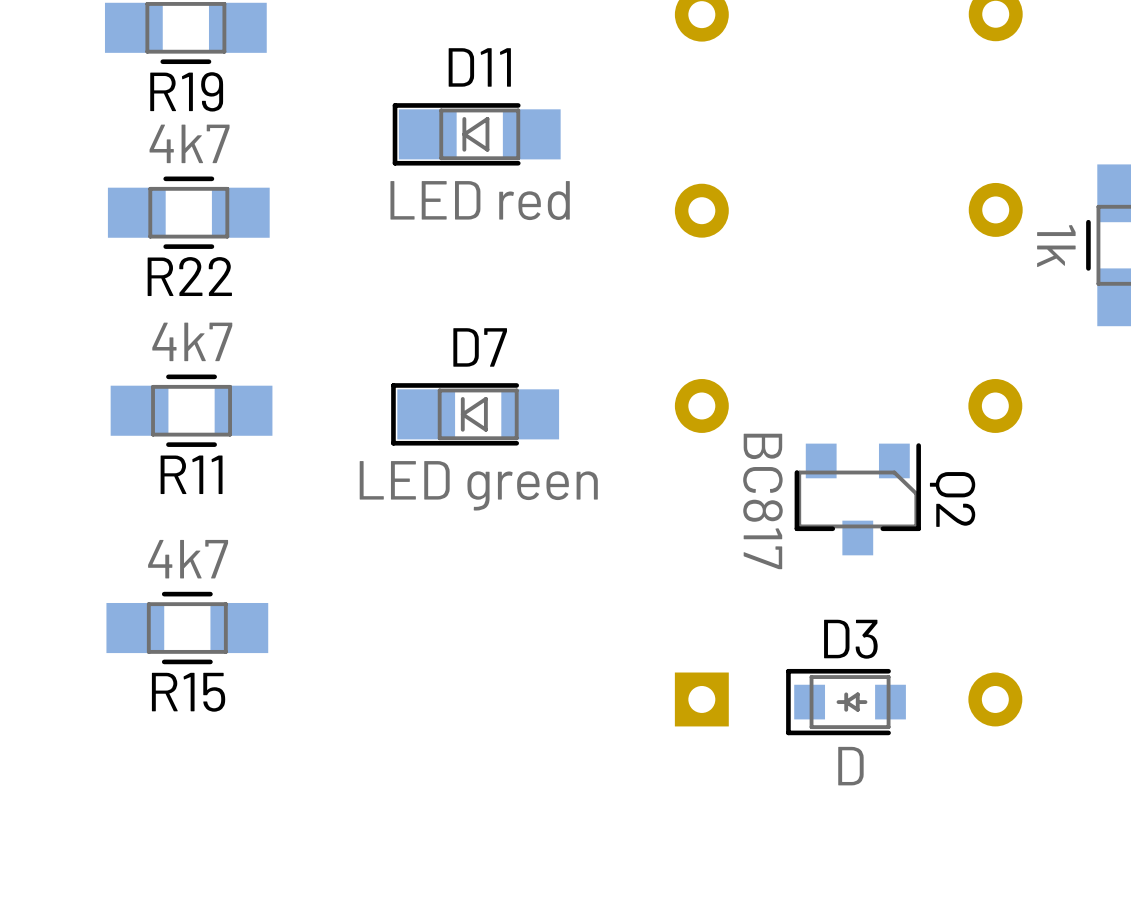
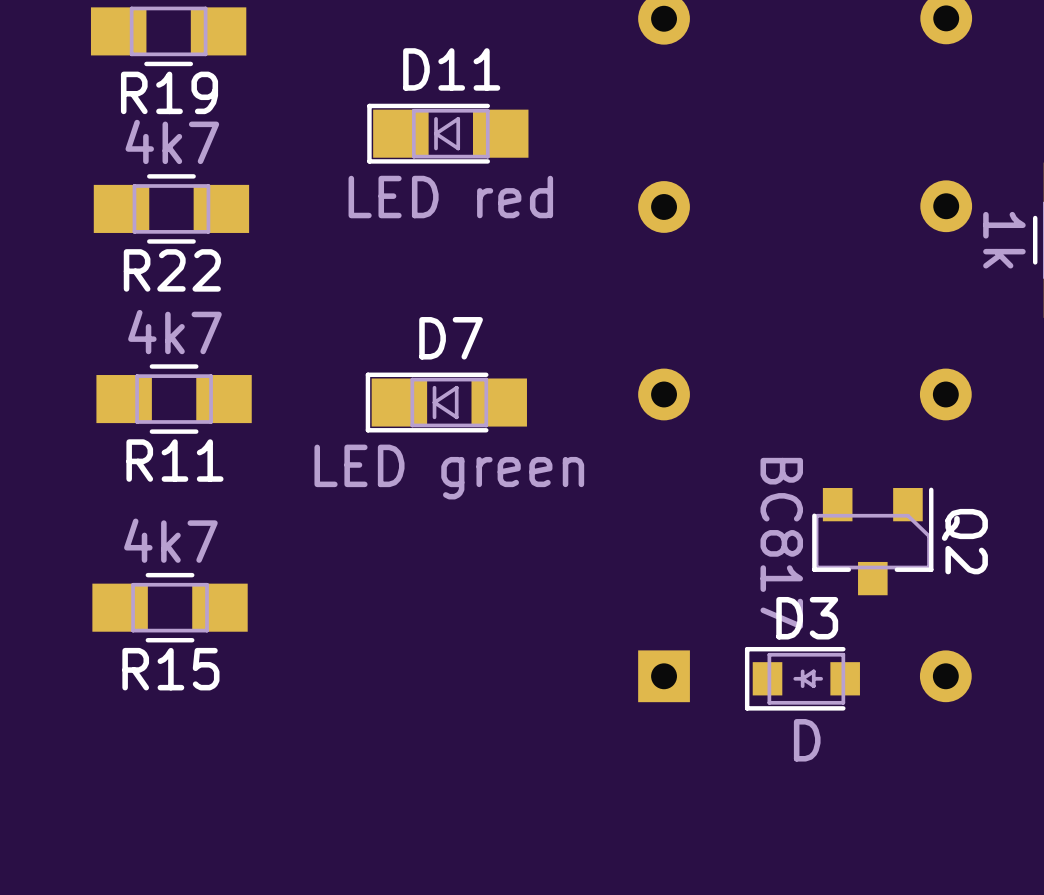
Q2 position: (857, 499) -> (872, 541)

